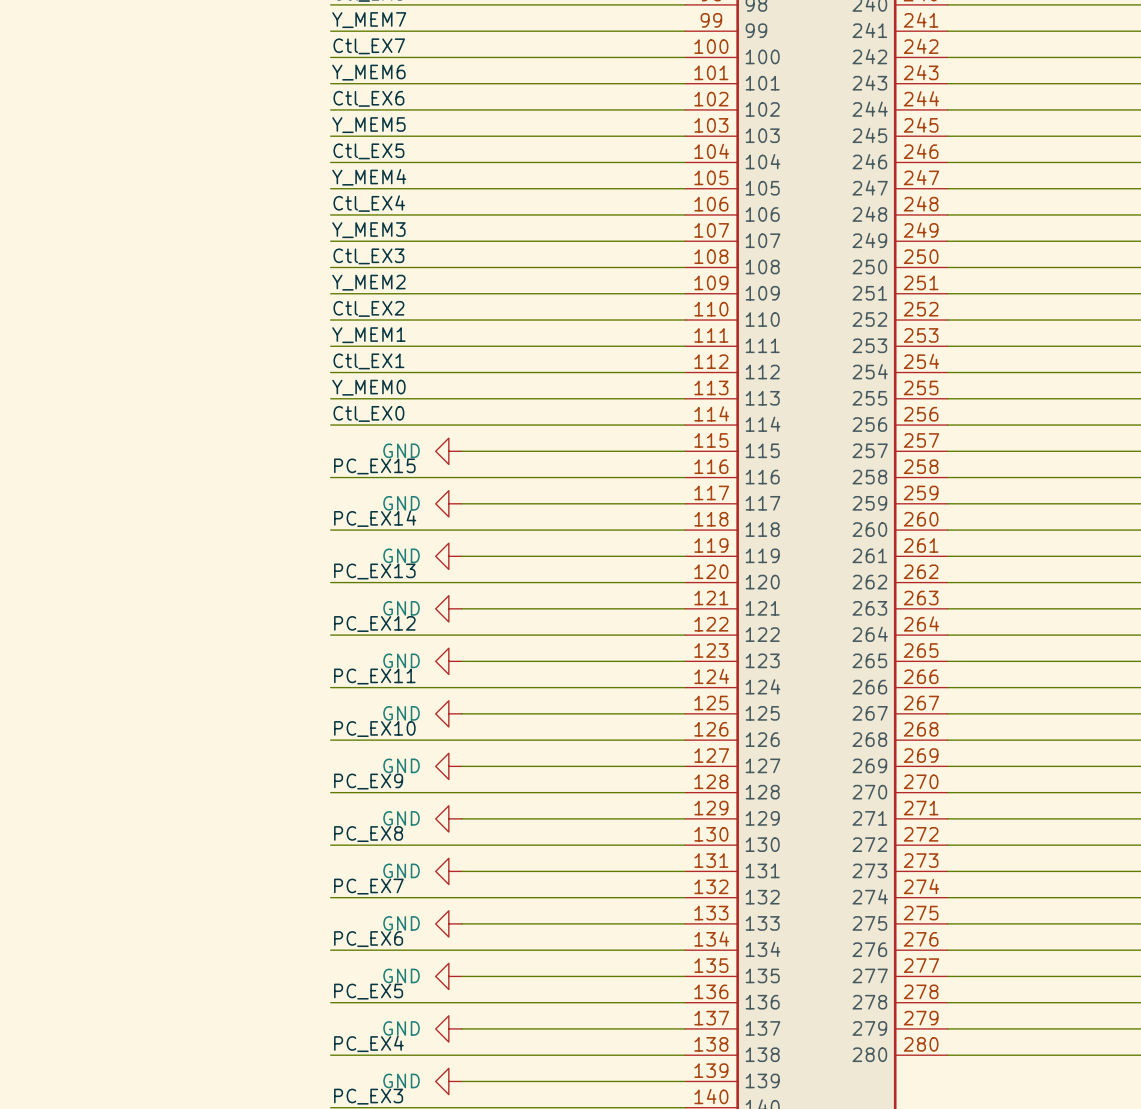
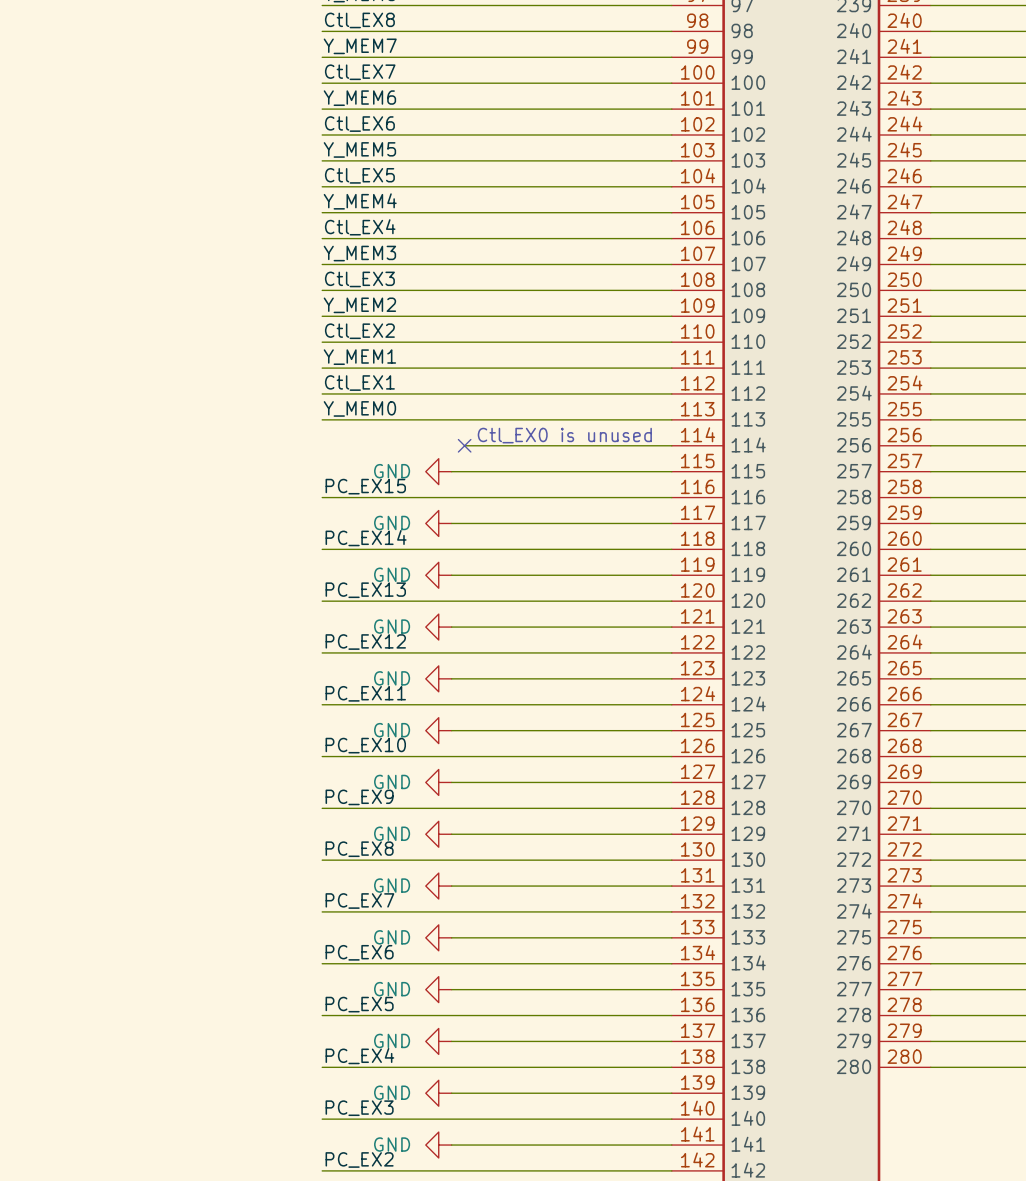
label: Ctl_EX0 (368, 413) -> none
text: none -> Ctl_EX0 is unused (564, 435)
wire: (330, 425) (475, 425) -> none
no-connect mark: none -> (464, 445)

